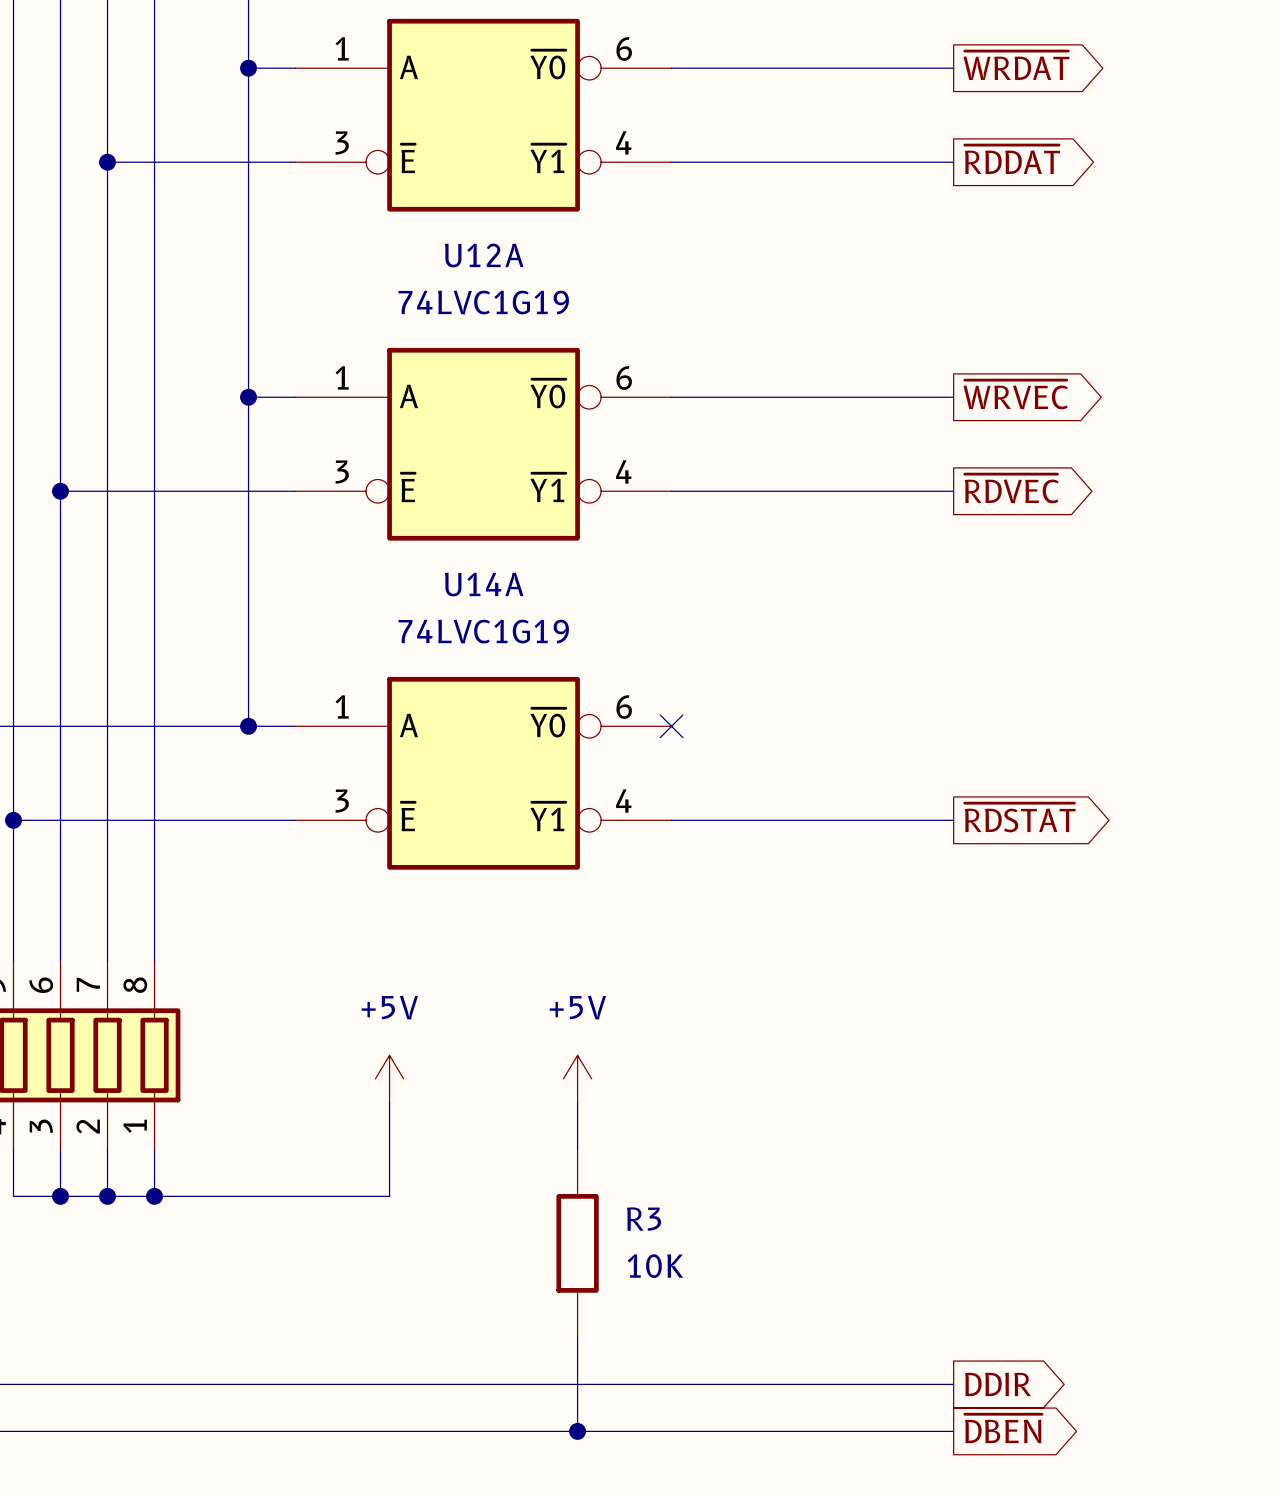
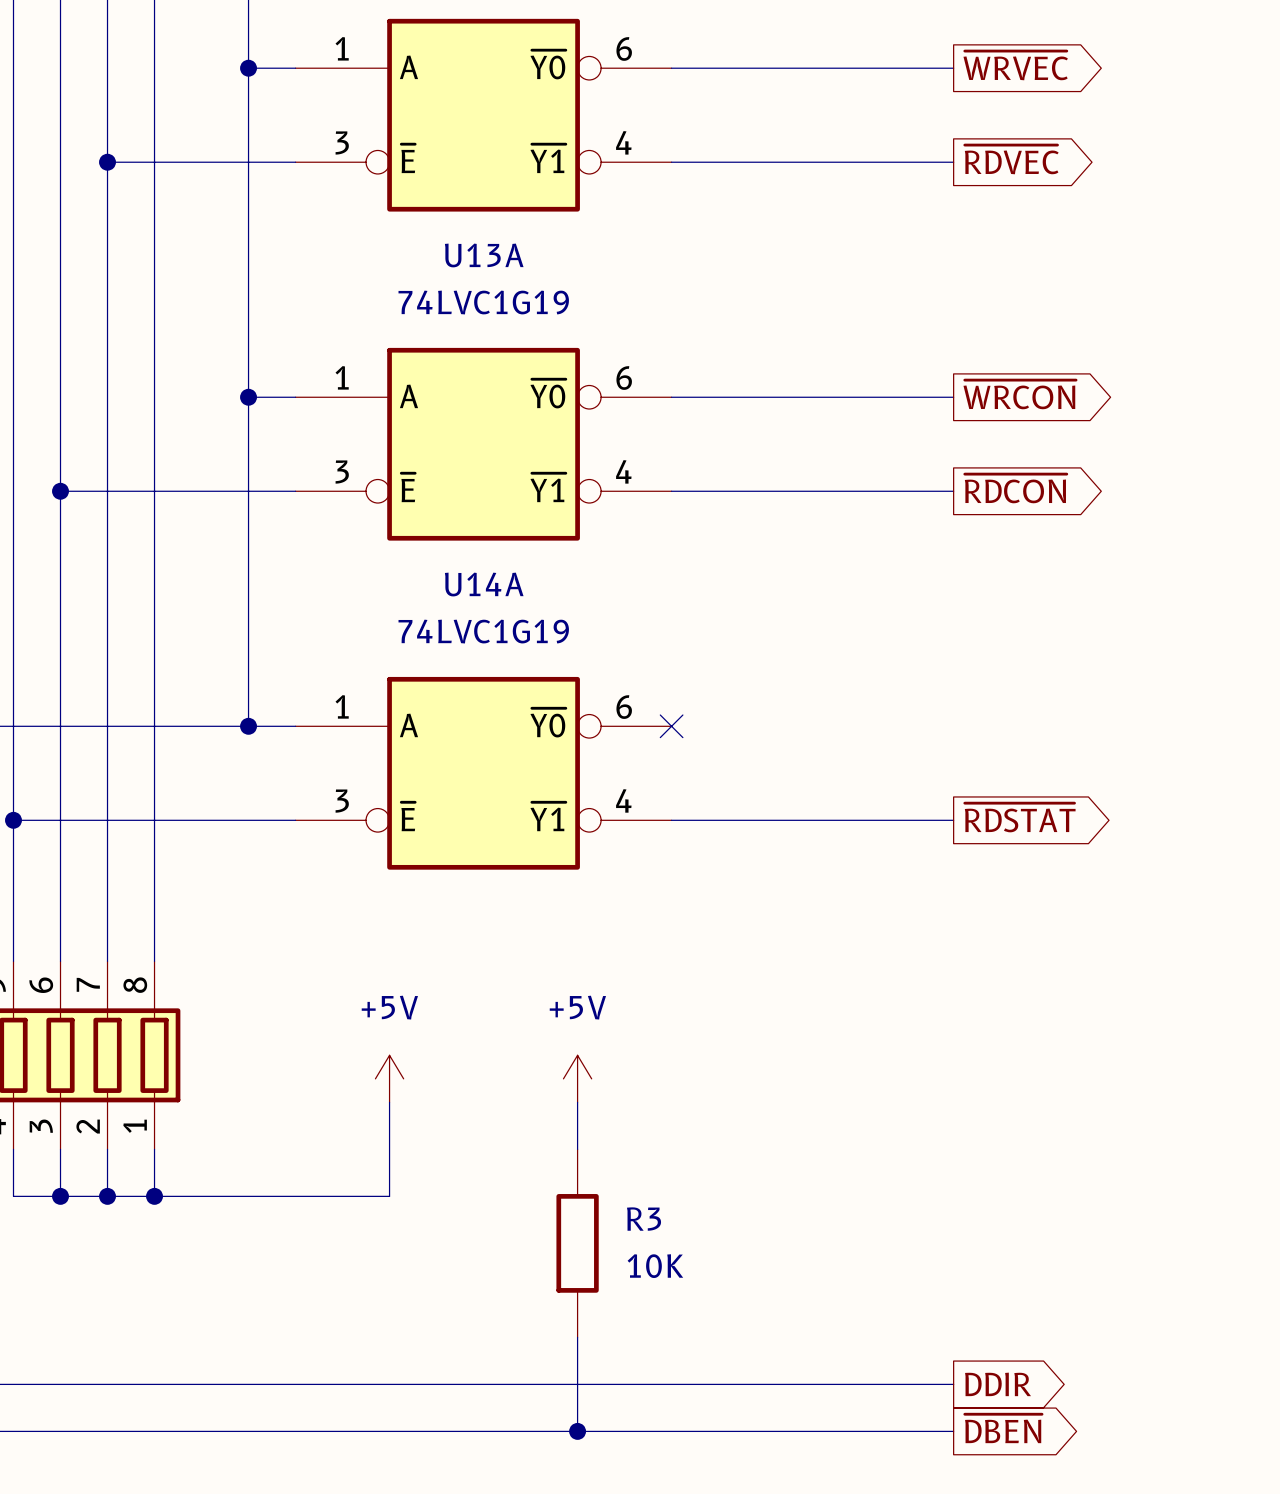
global label: ~{WRDAT} (1016, 65) -> ~{WRVEC} (1015, 65)
global label: ~{RDDAT} (1012, 159) -> ~{RDVEC} (1011, 159)
U12A name: U12A (484, 255) -> U13A (484, 255)
global label: ~{WRVEC} (1015, 394) -> ~{WRCON} (1019, 394)
global label: ~{RDVEC} (1011, 488) -> ~{RDCON} (1015, 488)

